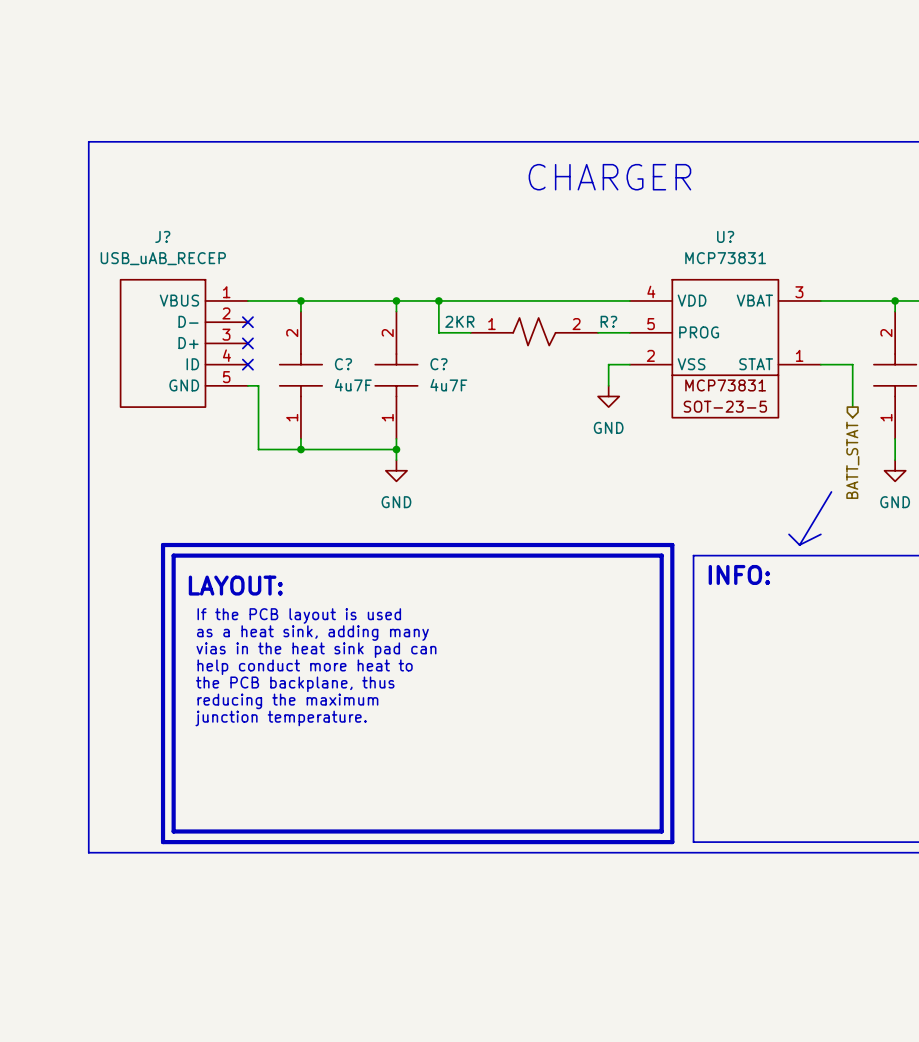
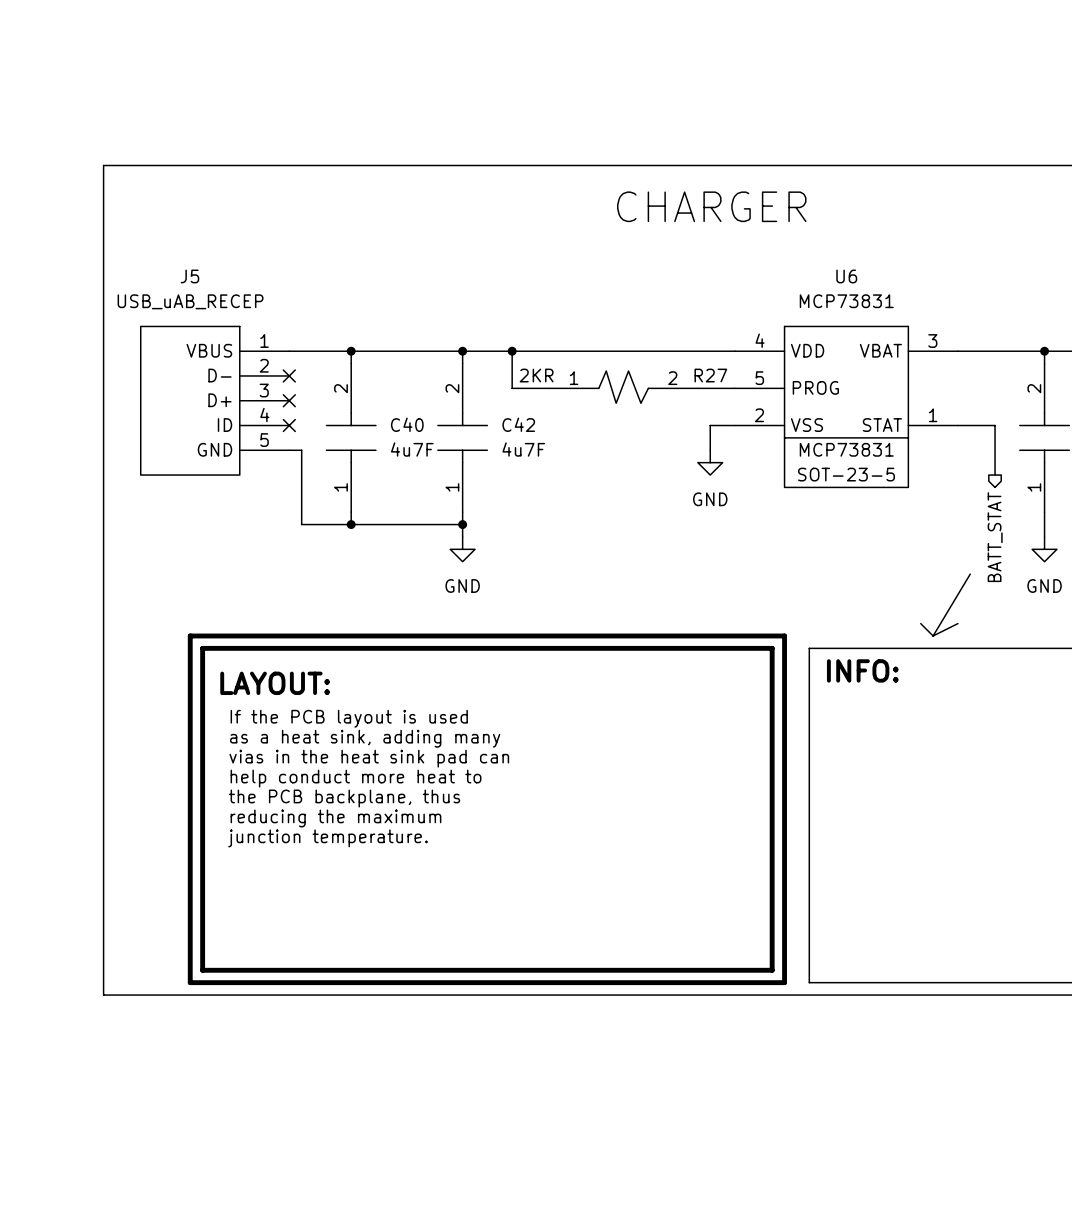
J? name: J? (162, 236) -> J5 (189, 276)
U? name: U? (725, 236) -> U6 (846, 276)
R? name: R? (608, 321) -> R27 (710, 375)
C? name: C? (343, 364) -> C40 (407, 424)
C? name: C? (438, 364) -> C42 (518, 424)

